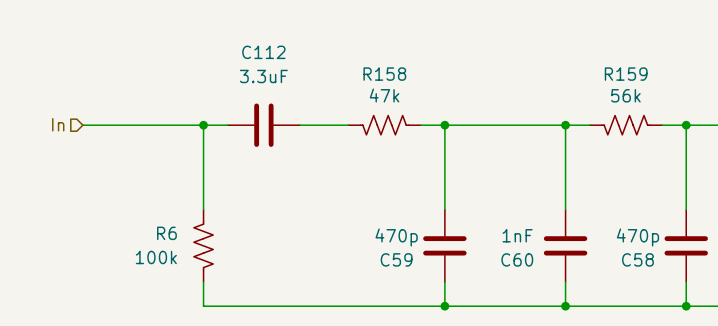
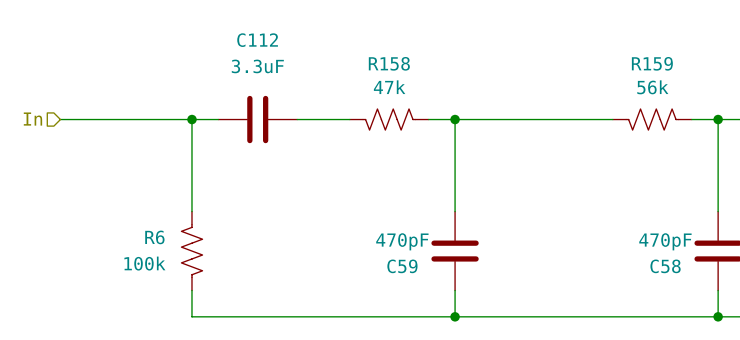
wire: (565, 125) (565, 209) -> none
junction: (565, 125) -> none
C59 value: 470p (396, 237) -> 470pF (402, 241)
C58 value: 470p (637, 237) -> 470pF (665, 241)
C60: 1nF (565, 245) -> none
wire: (565, 282) (565, 306) -> none
junction: (565, 306) -> none

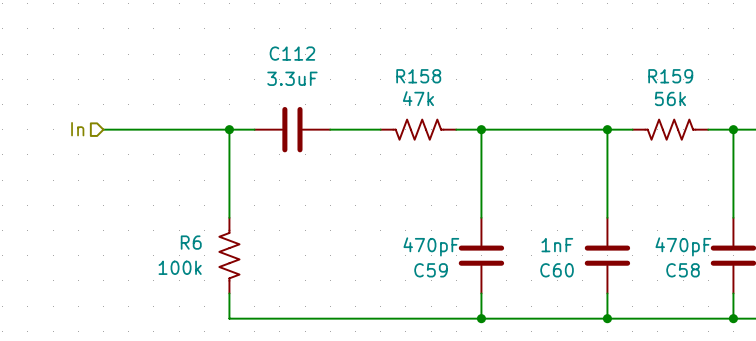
wire: none -> (607, 129) (607, 217)
junction: none -> (607, 129)
C60: none -> 1nF (607, 255)
wire: none -> (607, 293) (607, 318)
junction: none -> (607, 318)

